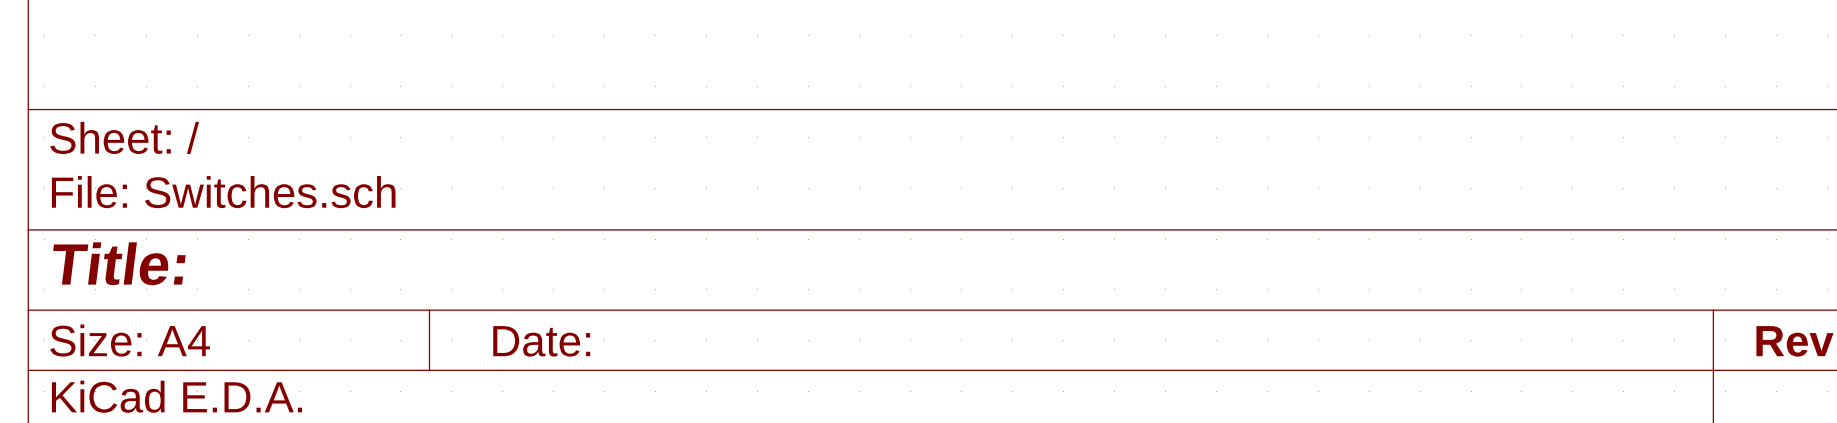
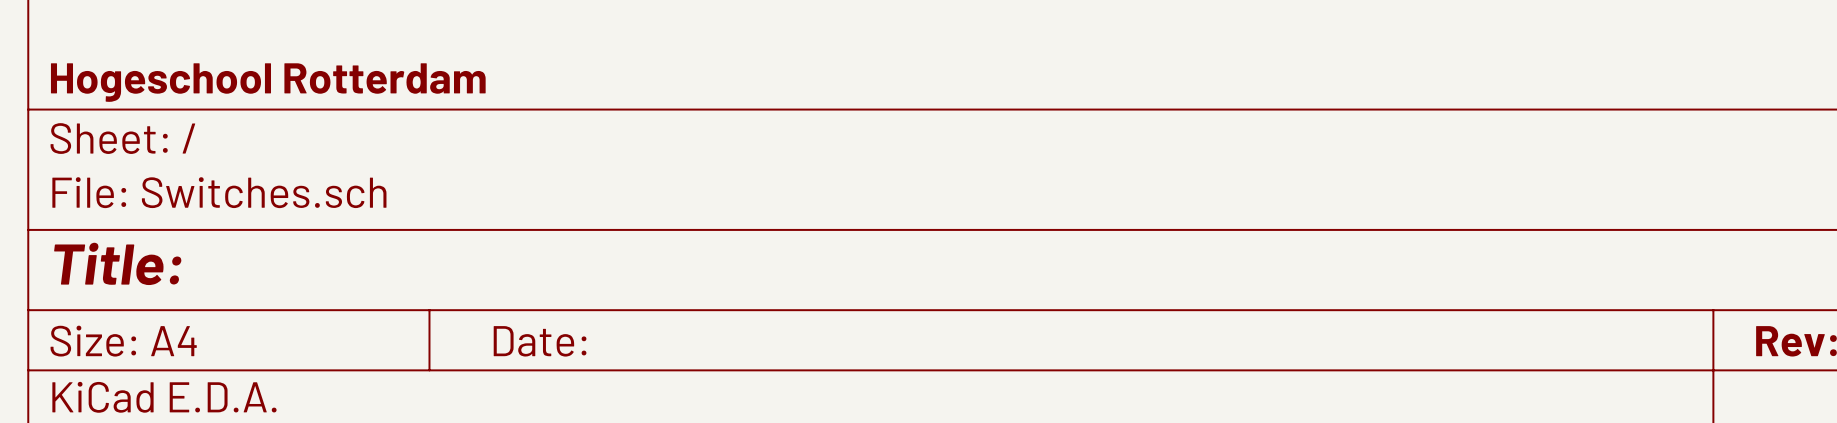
title block: none -> Hogeschool Rotterdam (268, 82)

